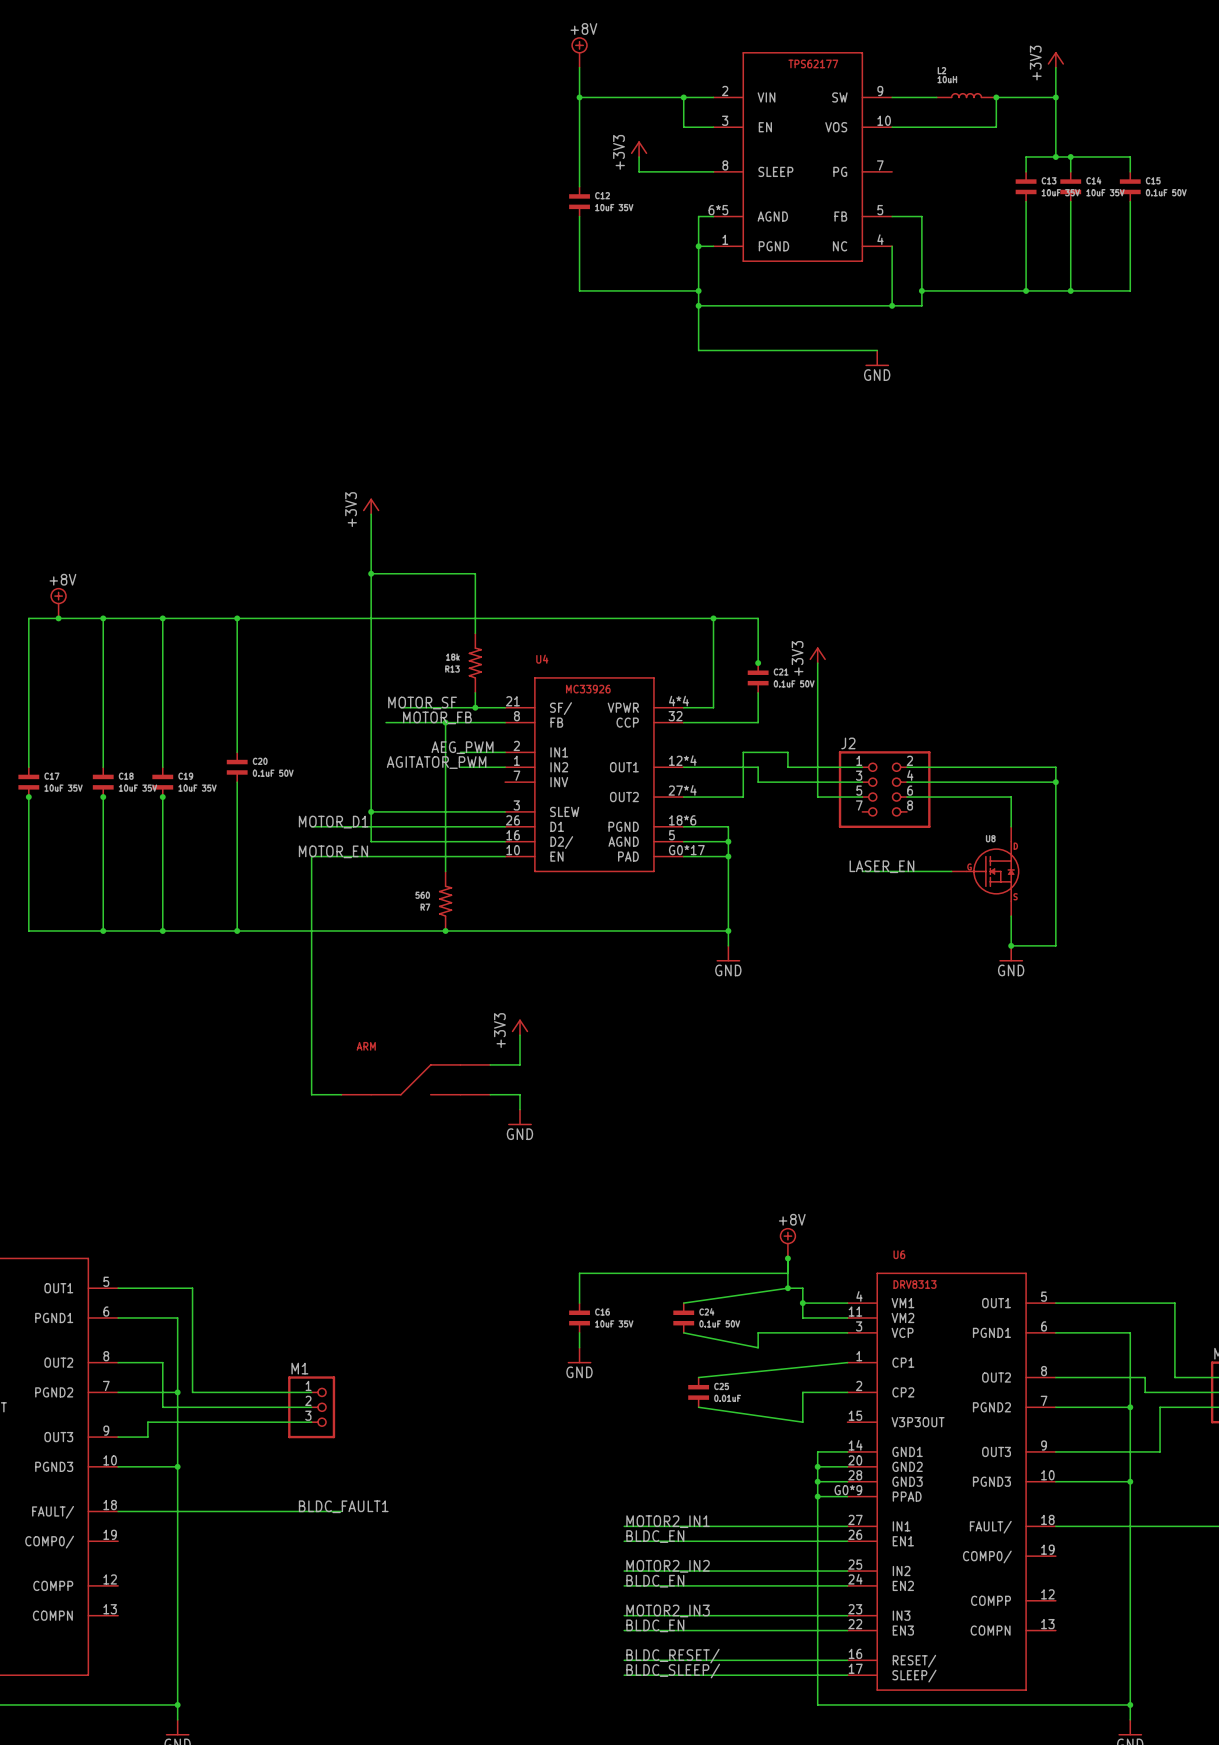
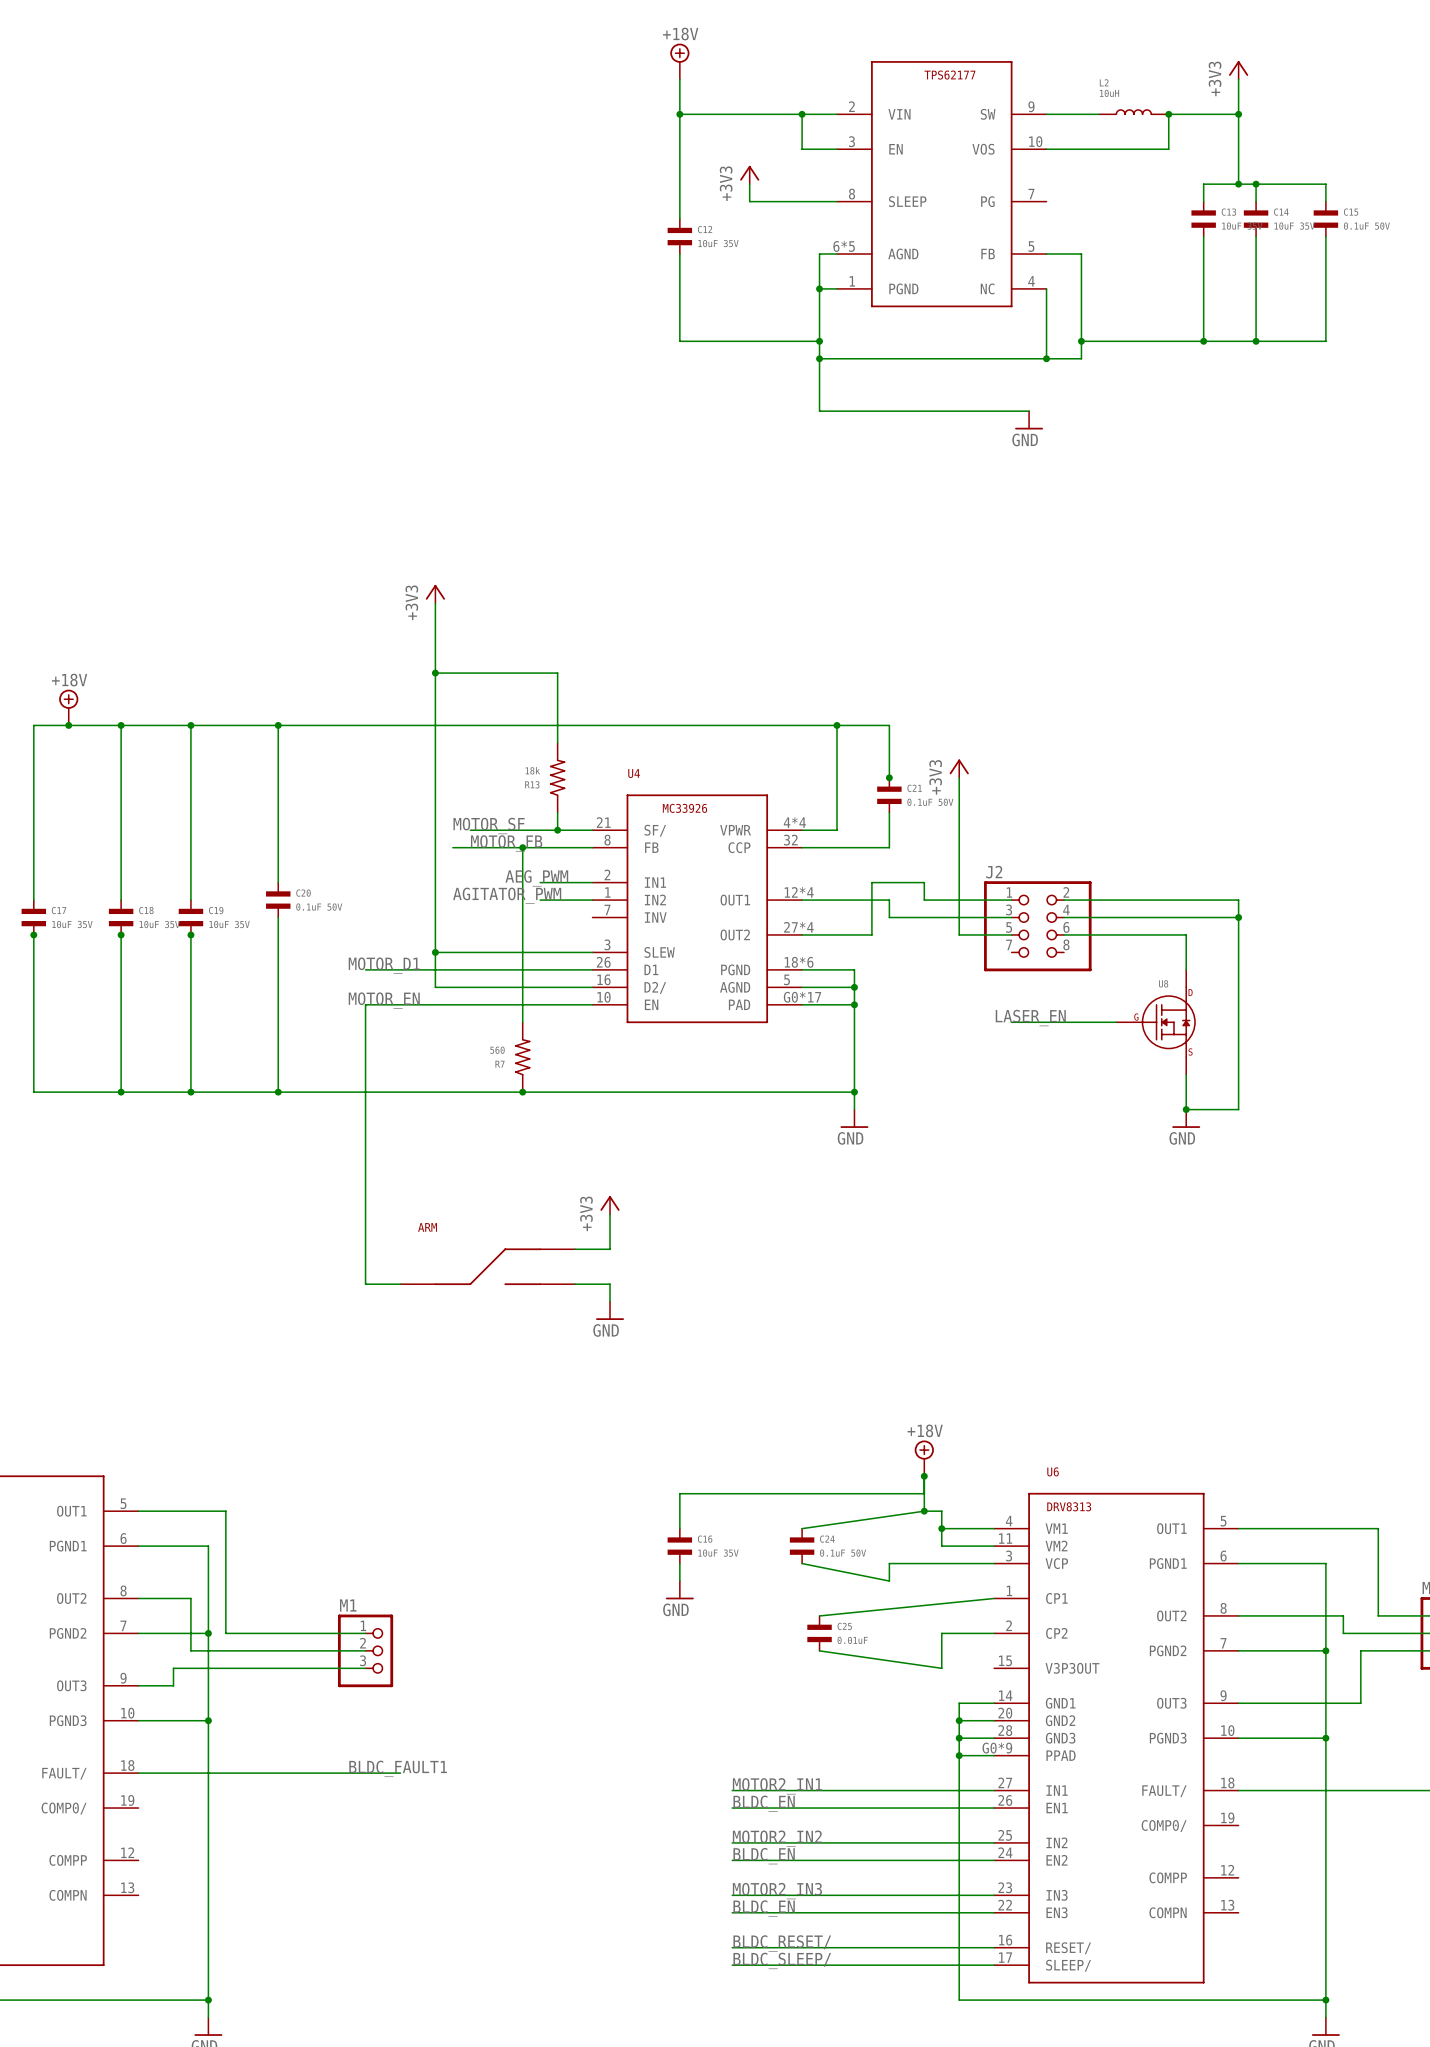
power symbol: +8V (579, 52) -> +18V (679, 61)
power symbol: +8V (58, 603) -> +18V (68, 707)
power symbol: +8V (787, 1243) -> +18V (924, 1458)

